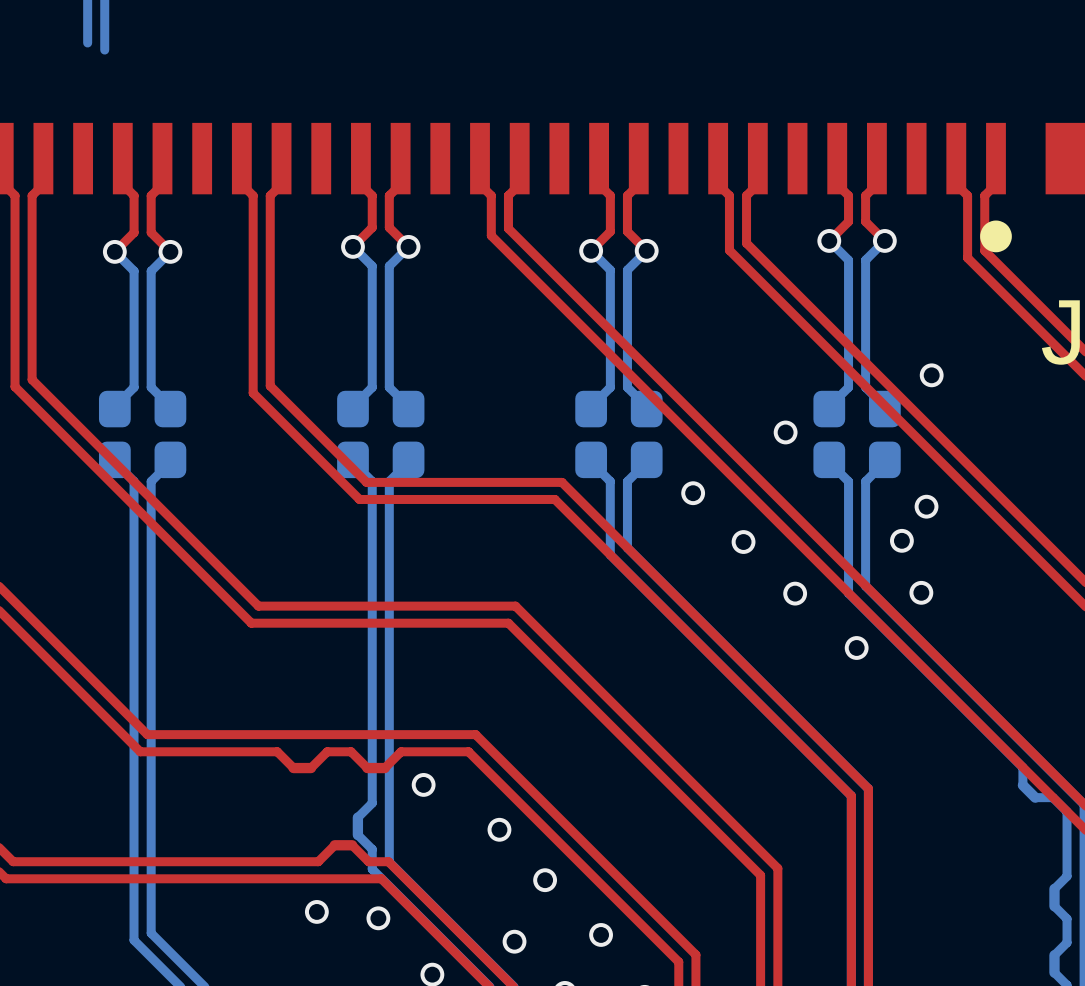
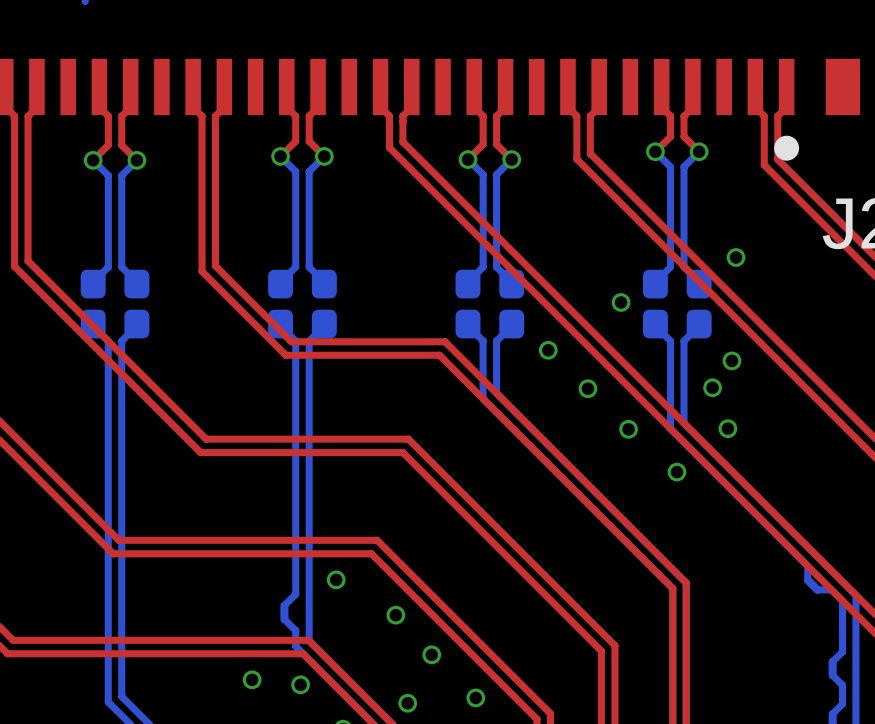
top track: (277, 751) (293, 768) (311, 768) (327, 751) -> (221, 553) (260, 553)
top track: (351, 751) (367, 768) (384, 768) (401, 751) -> (279, 553) (318, 553)
top track: (318, 861) (334, 845) (352, 845) (368, 861) -> (253, 640) (292, 640)

